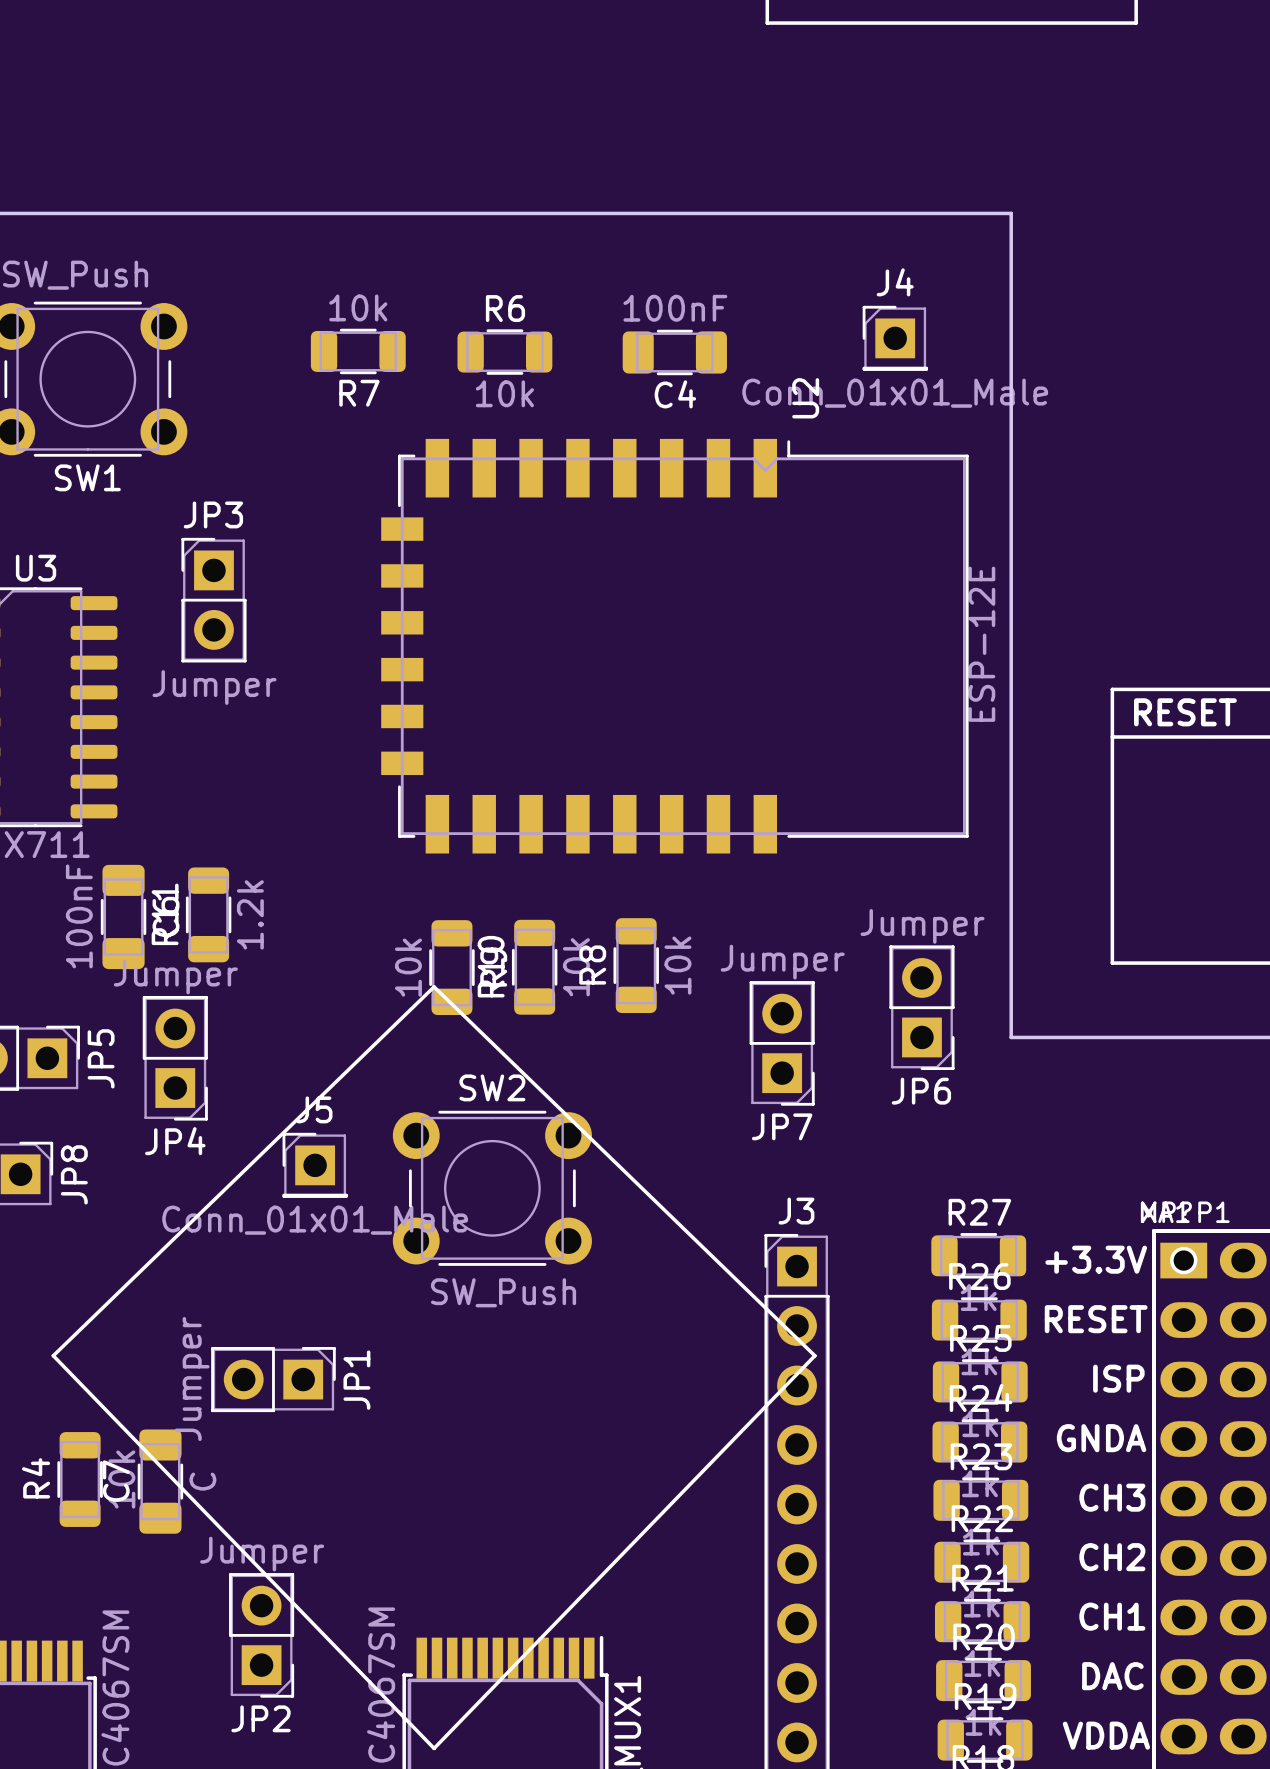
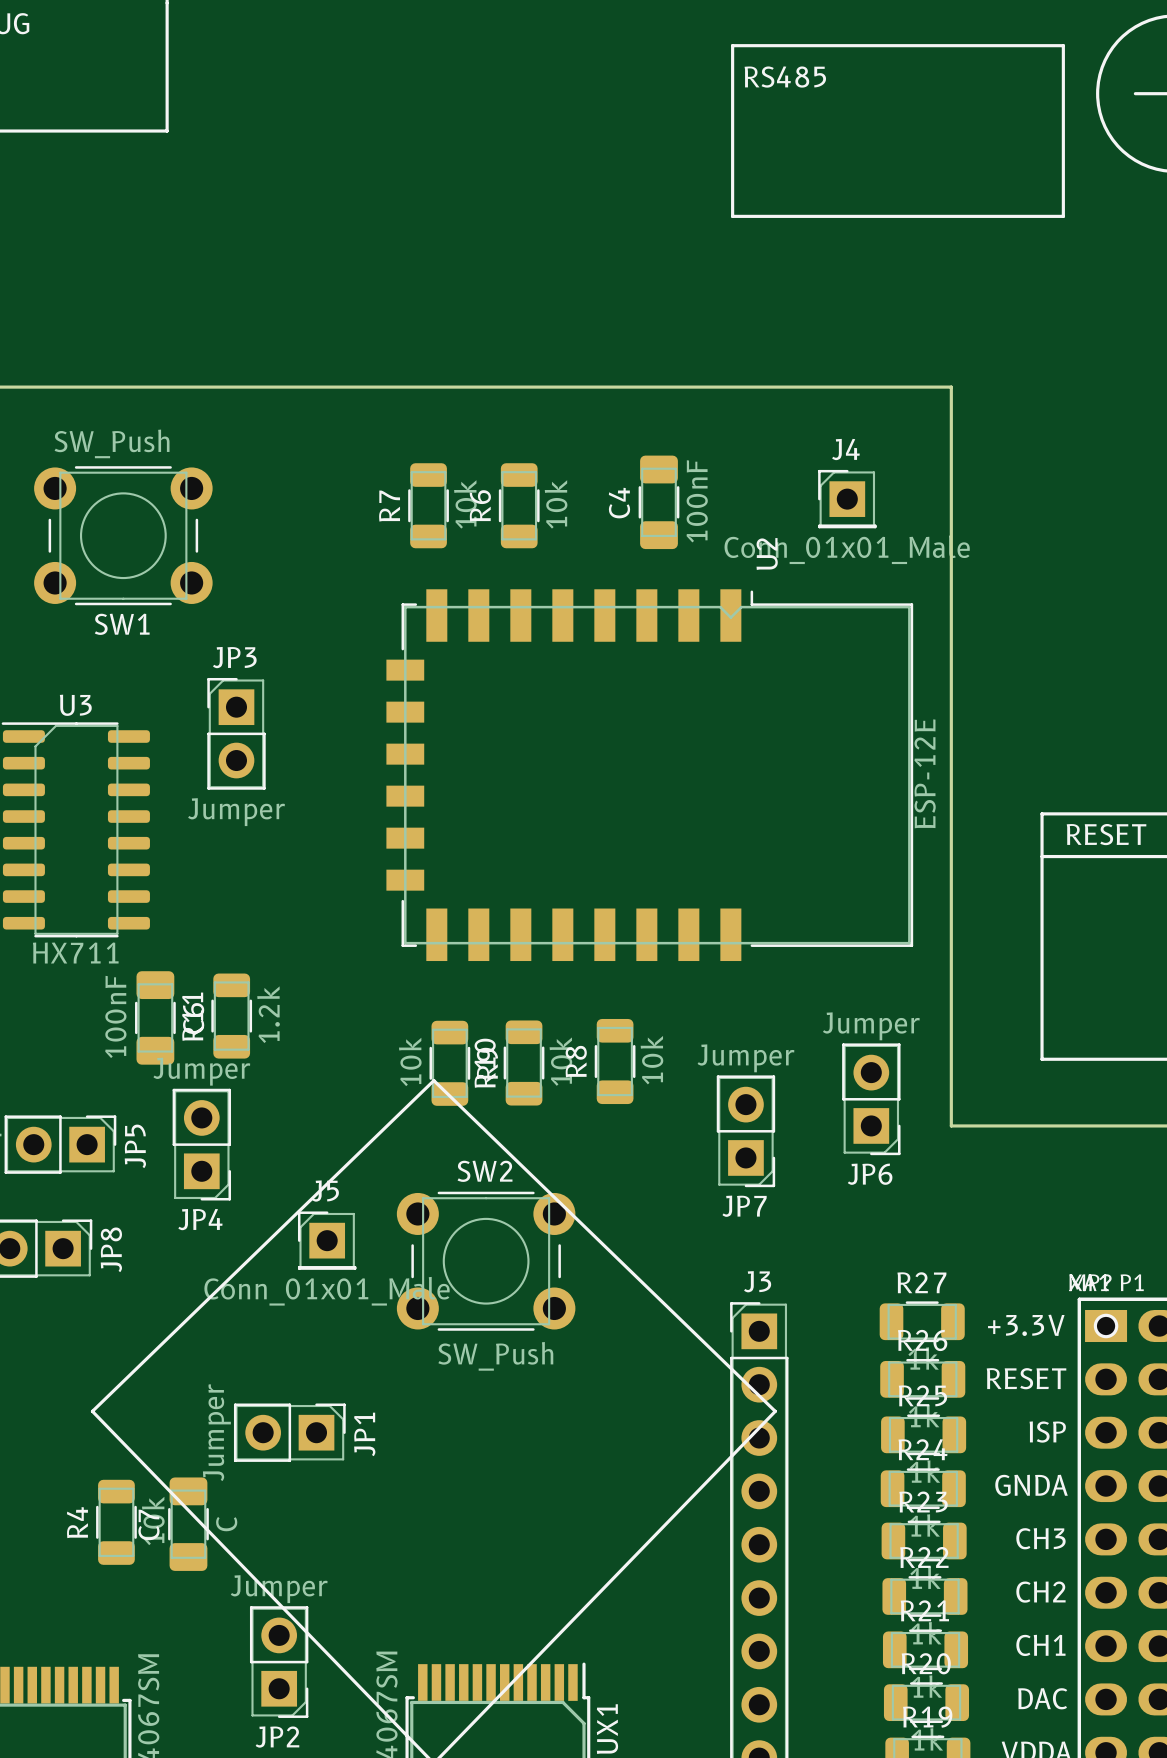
R6 name position: R6 (505, 308) -> R6 (480, 505)
R7 rotation: 0° (358, 351) -> 90° clockwise (428, 505)
R7 position: (358, 351) -> (428, 505)
R6 rotation: 0° (504, 352) -> 90° clockwise (519, 505)
C4 rotation: 0° (674, 352) -> 90° clockwise (658, 502)
R6 value position: 10k (504, 393) -> 10k (556, 504)

